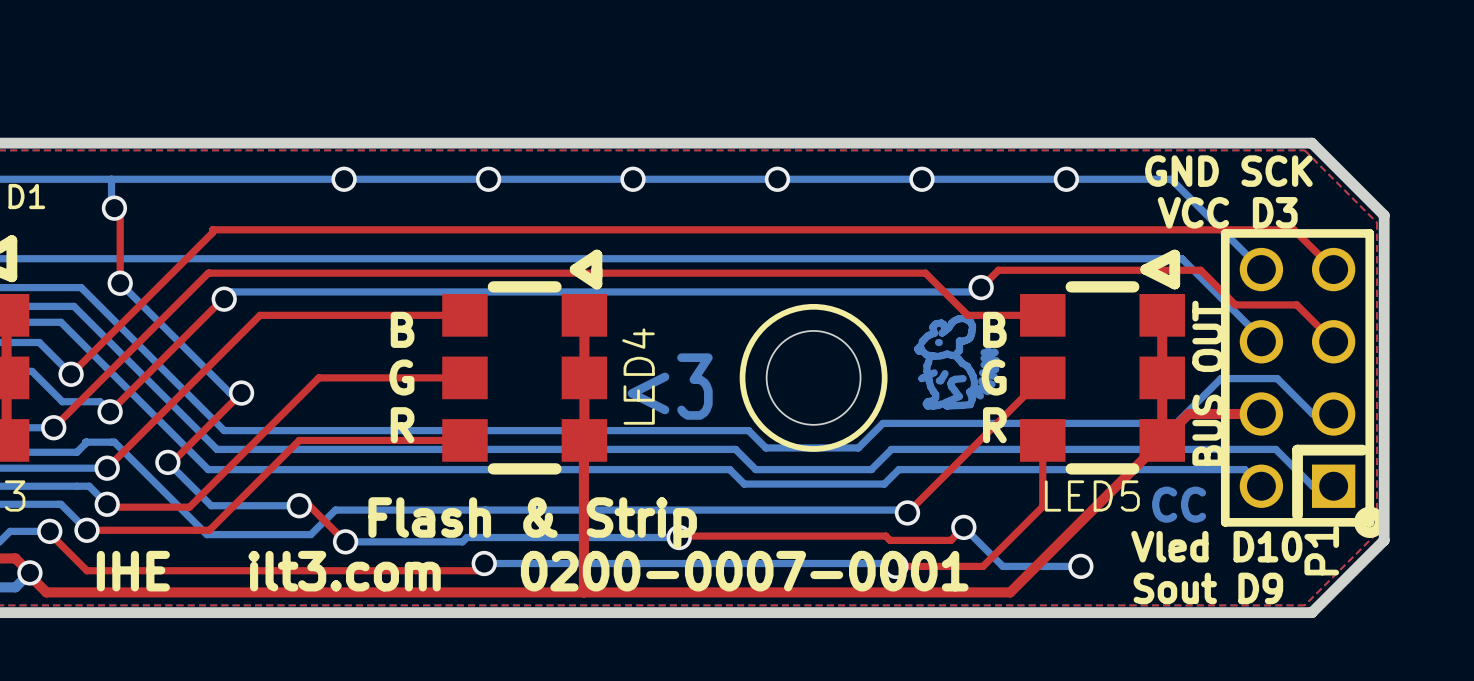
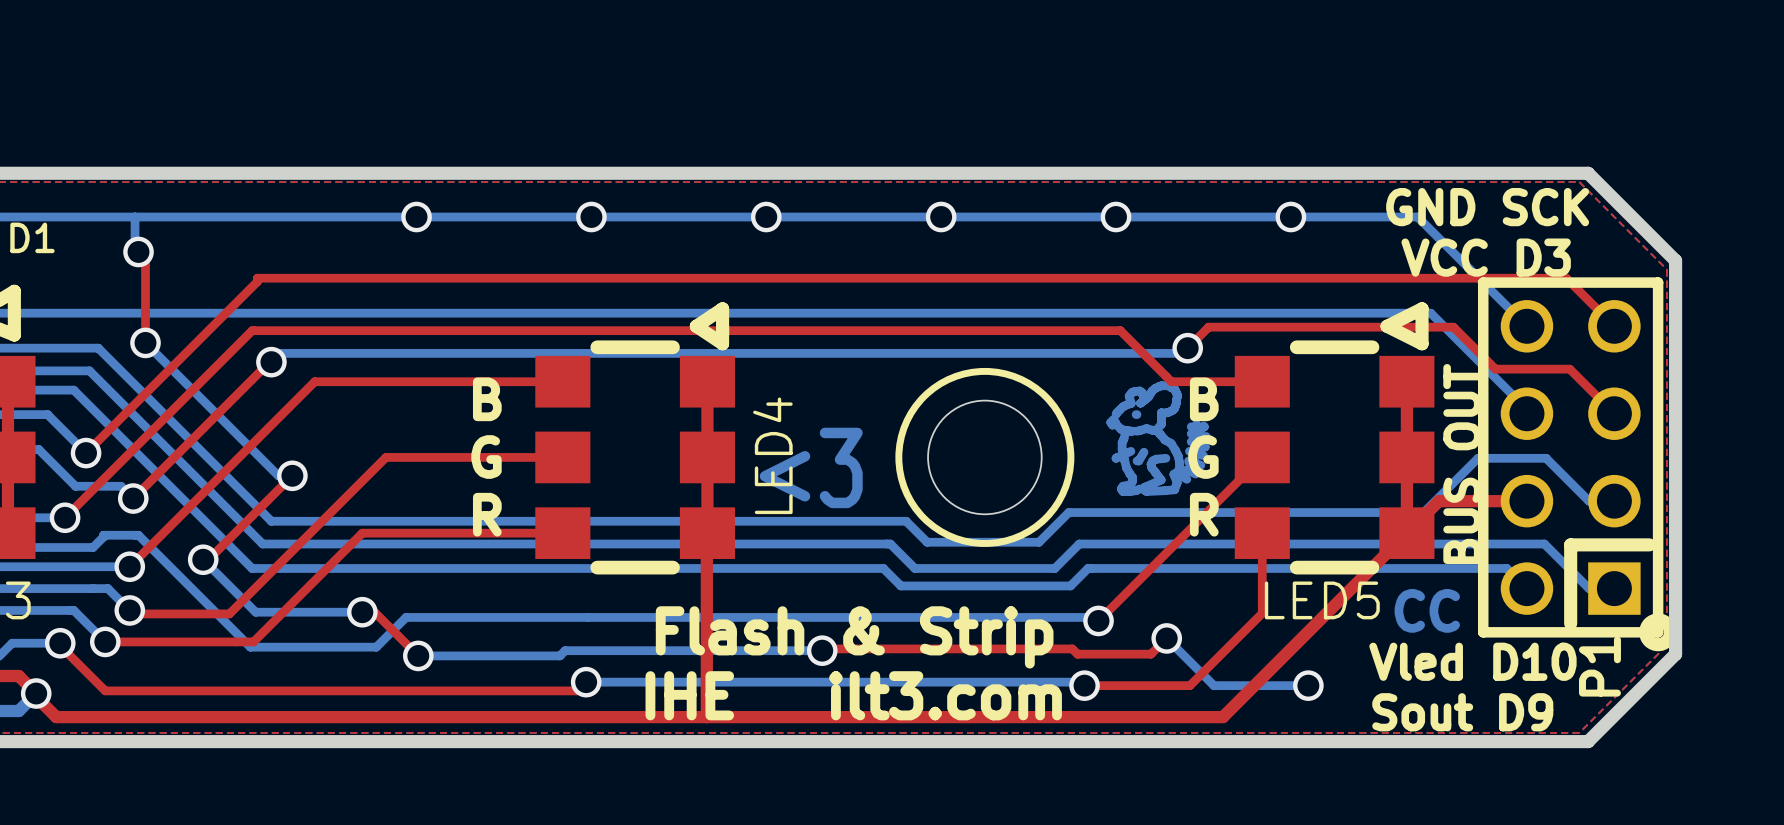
text position: Flash & Strip (532, 522) -> Flash & Strip (854, 637)
text: IHE ilt3.com 0200-0007-0001 (532, 571) -> IHE ilt3.com (853, 695)

